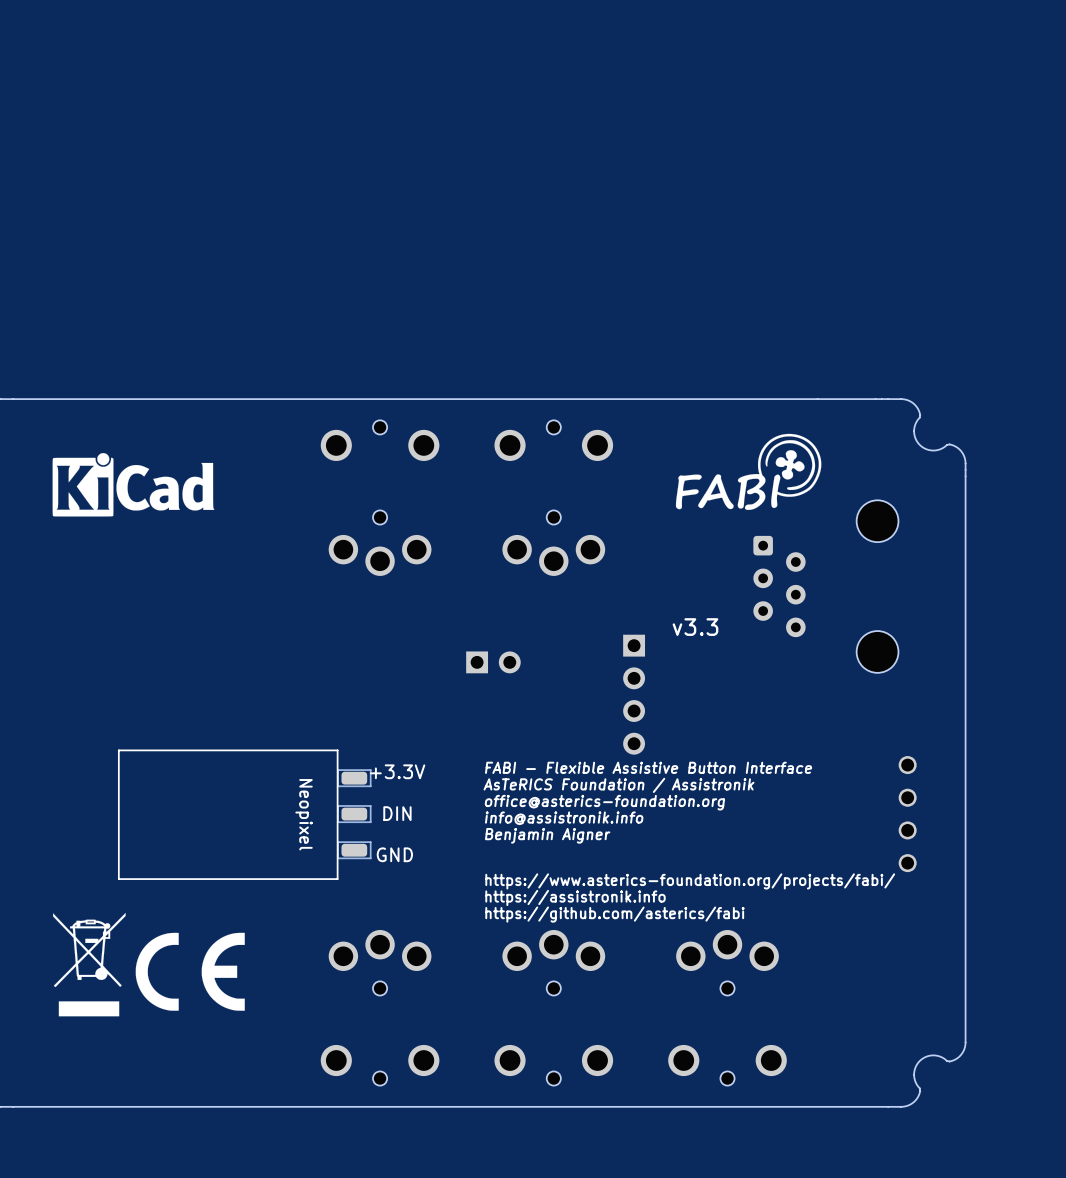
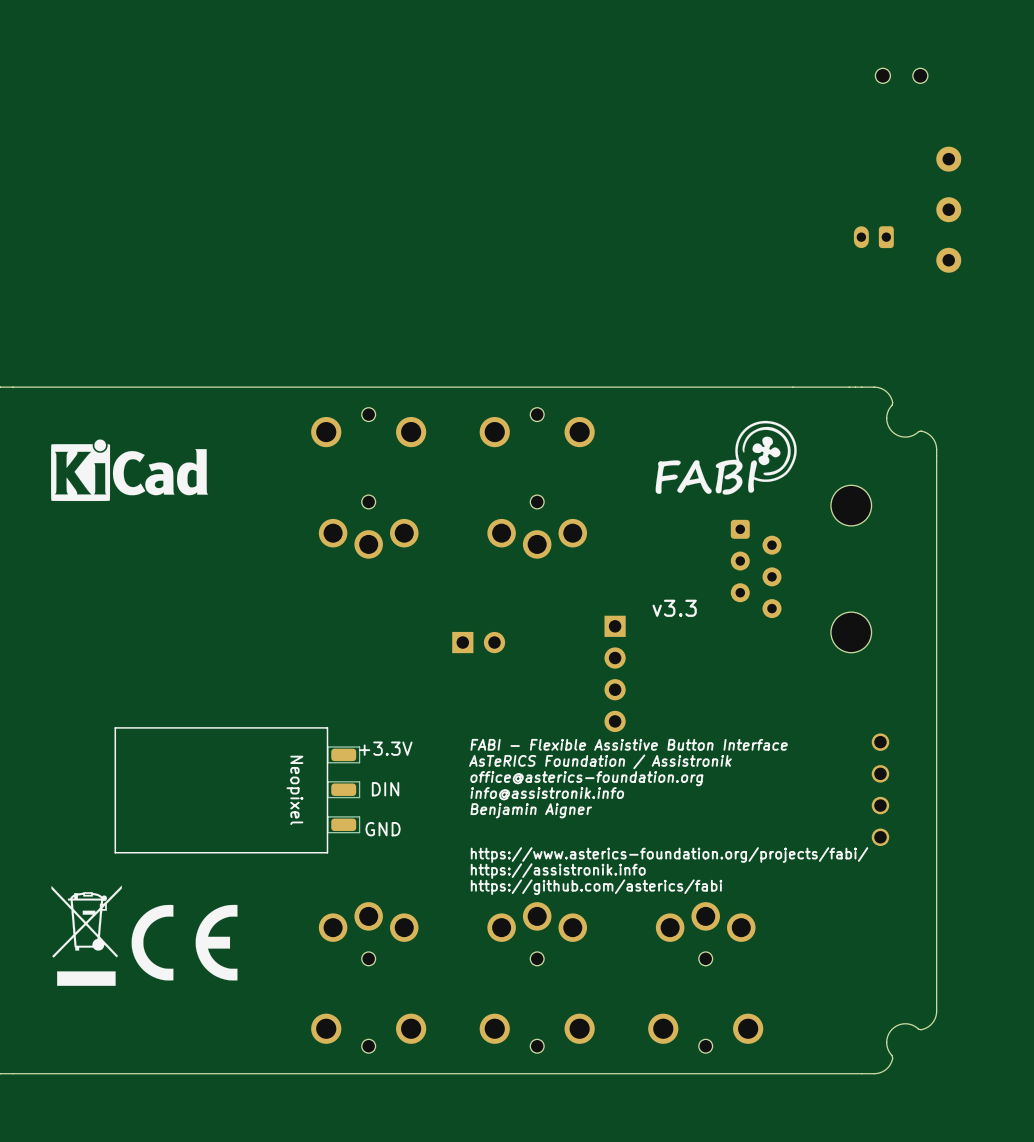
part: none -> (901, 75)
part: none -> (948, 159)
part: none -> (948, 209)
part: none -> (873, 237)
part: none -> (948, 260)

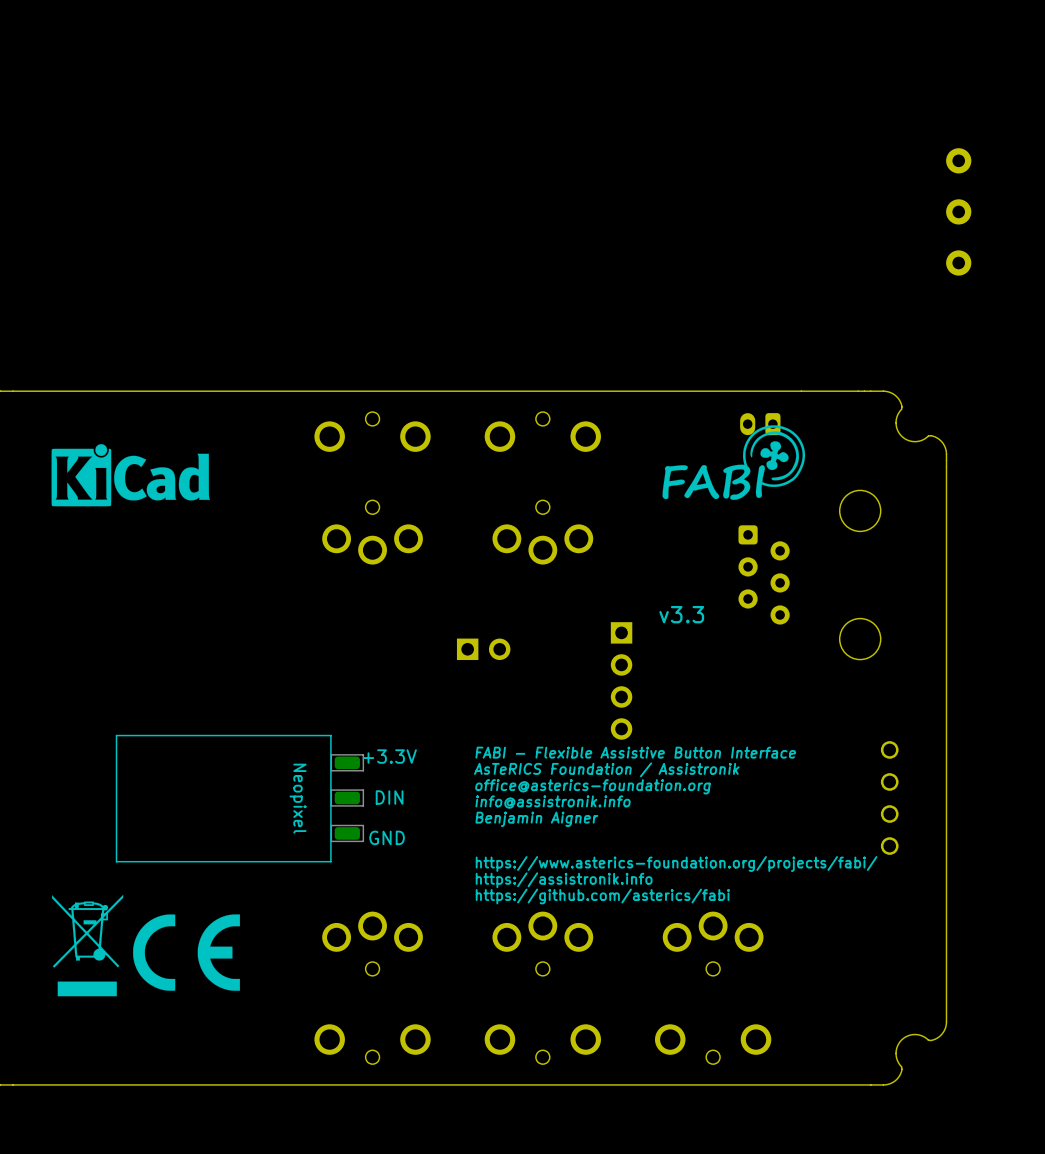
part: (901, 75) -> none
part position: (873, 237) -> (760, 424)

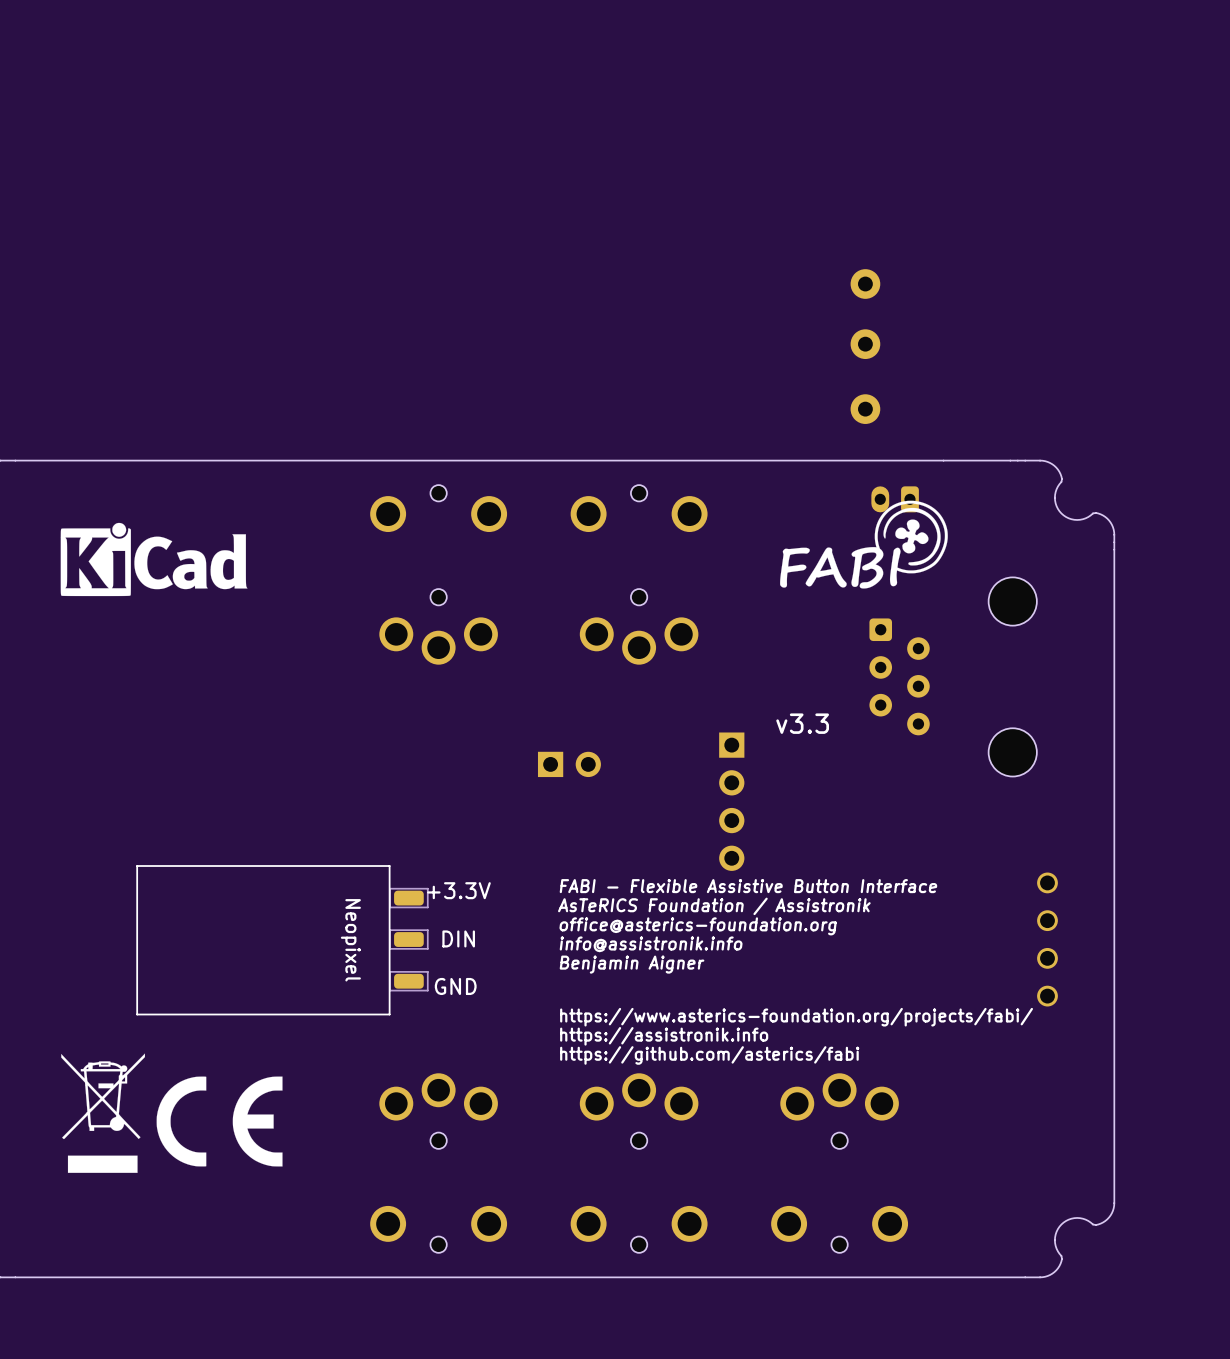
part: (958, 160) -> none
part: (958, 211) -> none
part: none -> (865, 284)
part: (958, 262) -> none
part: none -> (865, 344)
part: none -> (865, 409)

